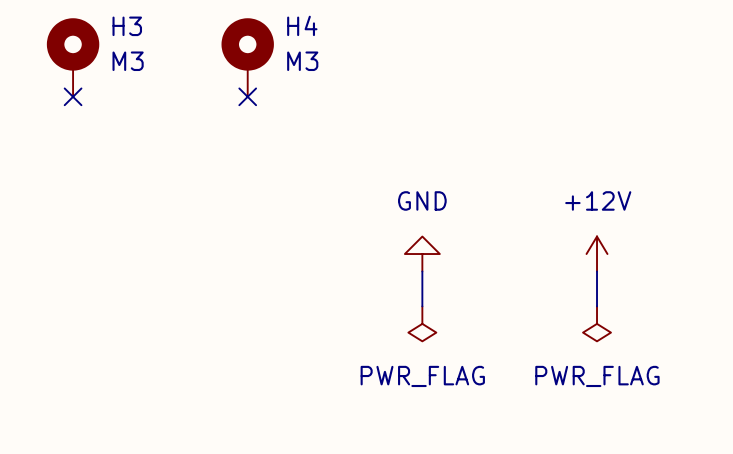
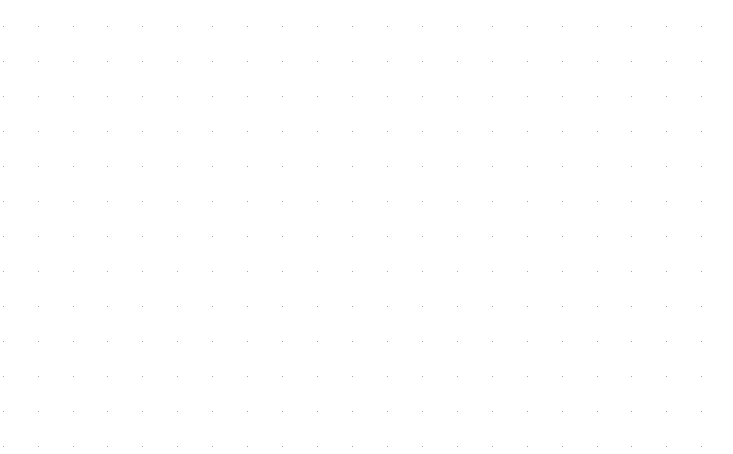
H3: M3 (73, 57) -> none
H4: M3 (247, 57) -> none
no-connect mark: (73, 96) -> none
no-connect mark: (247, 96) -> none
power symbol: GND (422, 254) -> none
power symbol: +12V (597, 254) -> none
wire: (422, 271) (422, 306) -> none
wire: (597, 271) (597, 306) -> none
power symbol: PWR_FLAG (422, 323) -> none
power symbol: PWR_FLAG (597, 323) -> none

